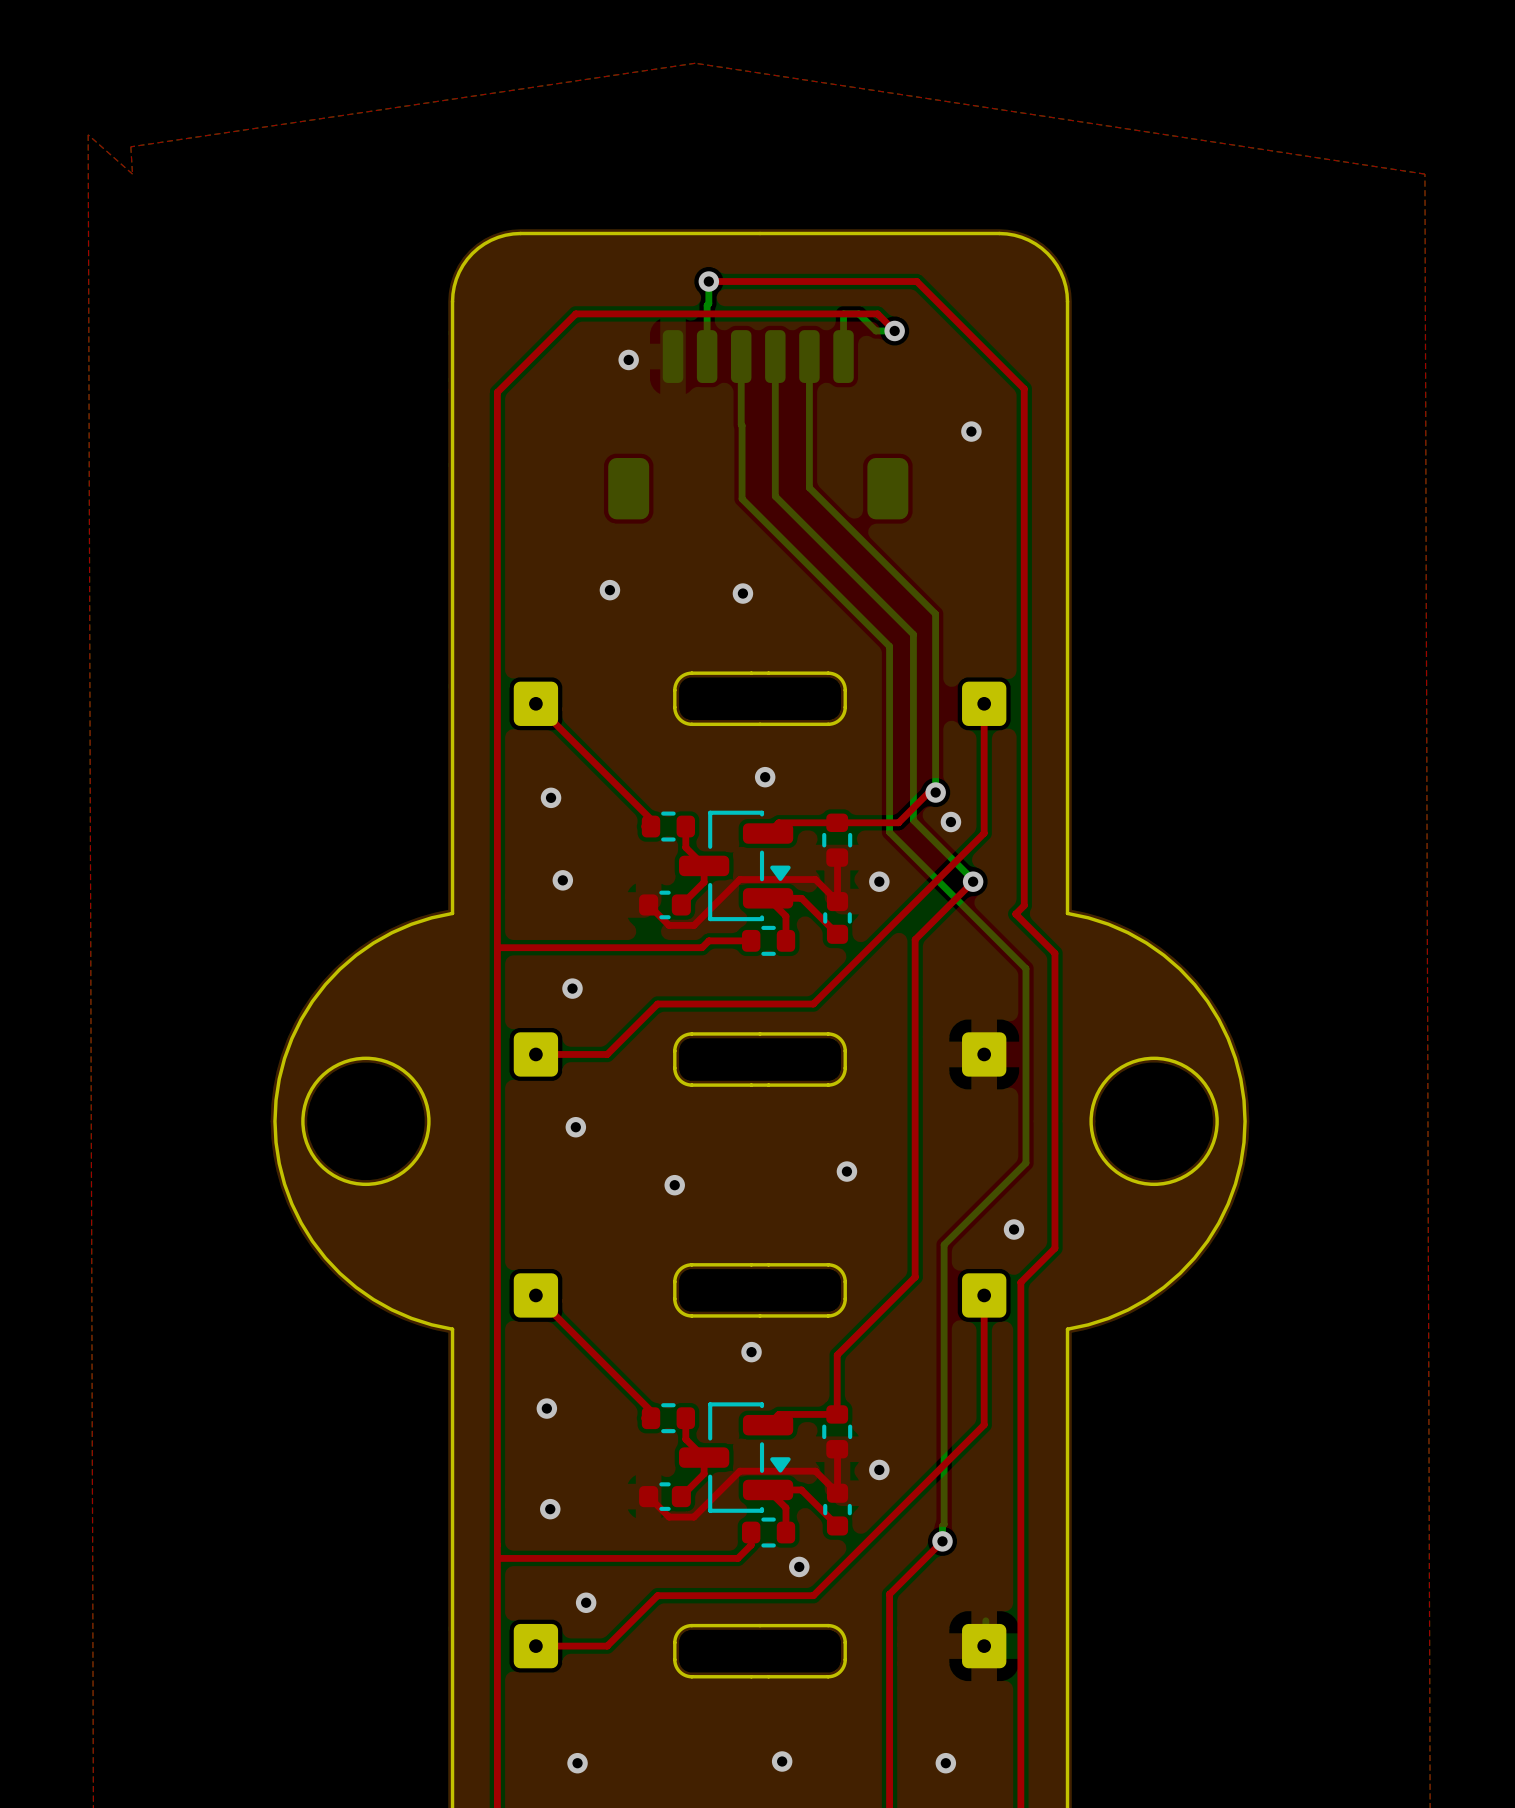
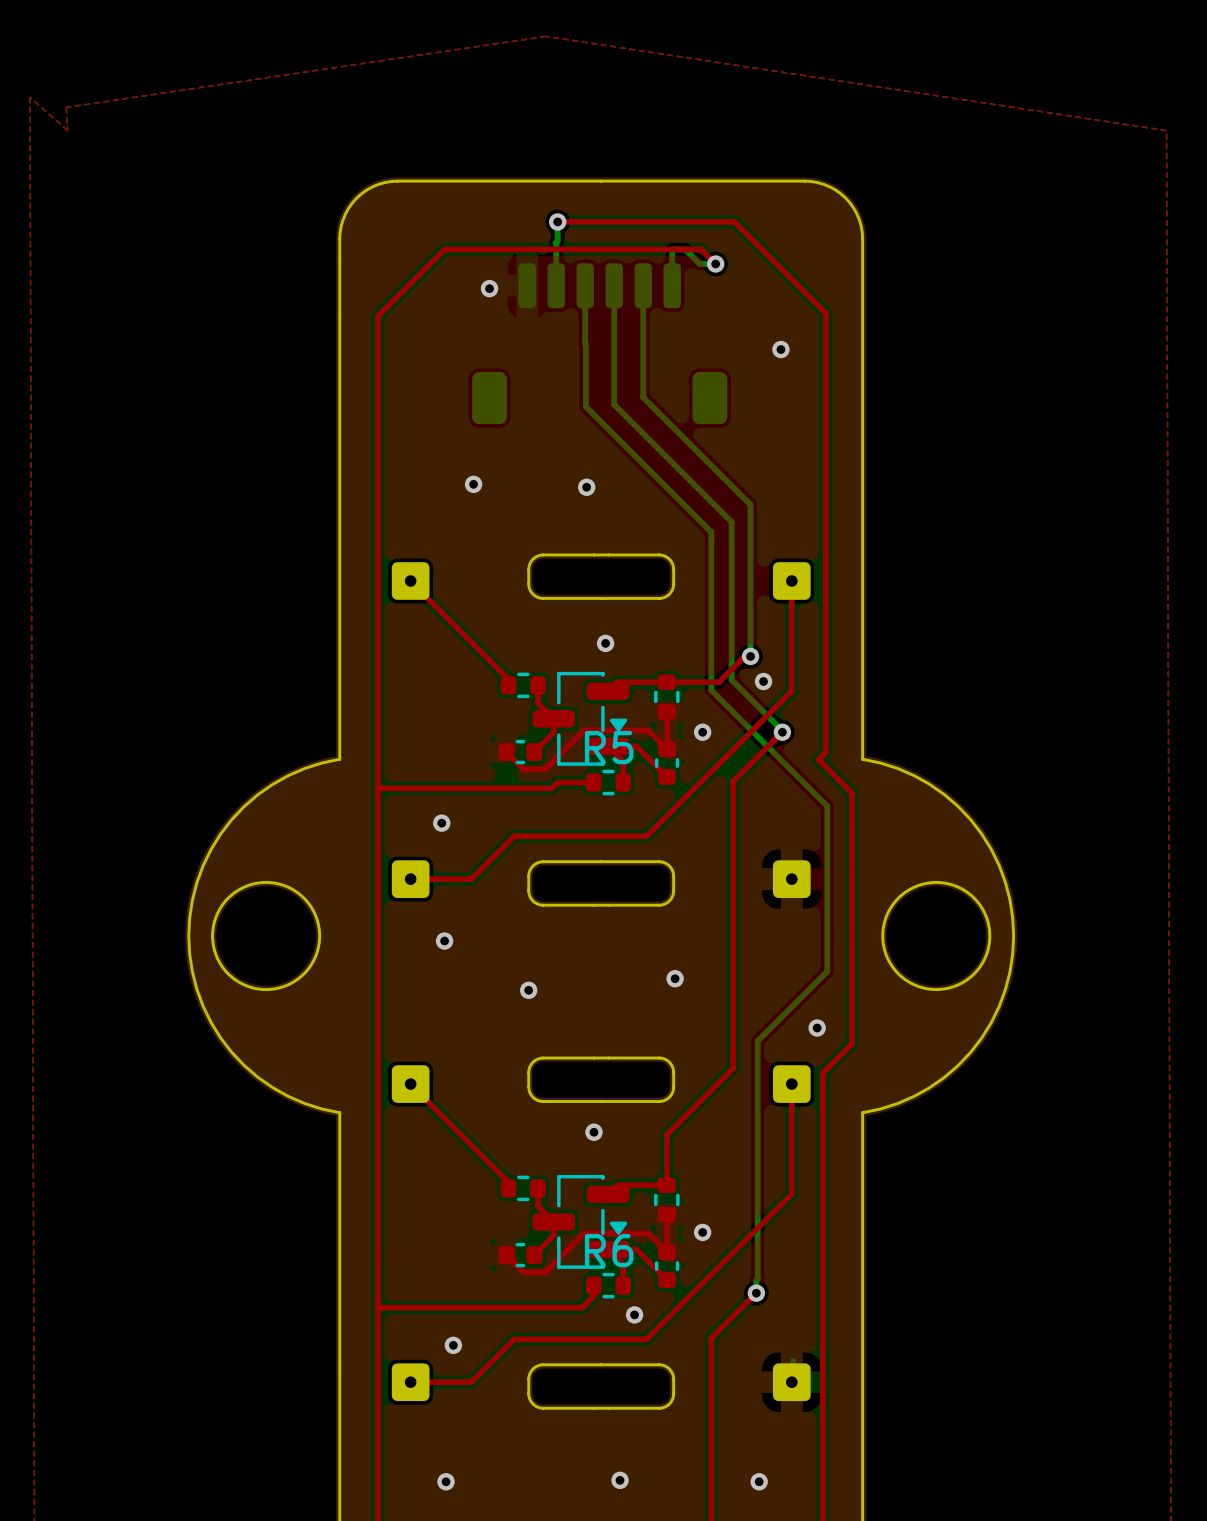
via: (551, 797) -> none
via: (562, 880) -> none
R5 name: none -> R5 (609, 747)
via: (546, 1408) -> none
R6 name: none -> R6 (609, 1250)
via: (550, 1509) -> none

